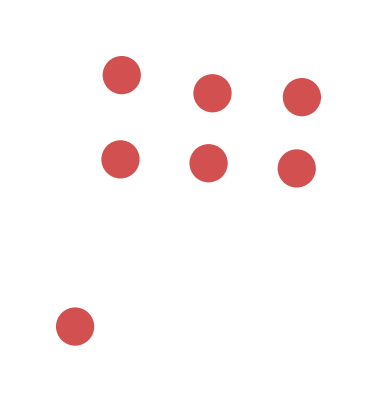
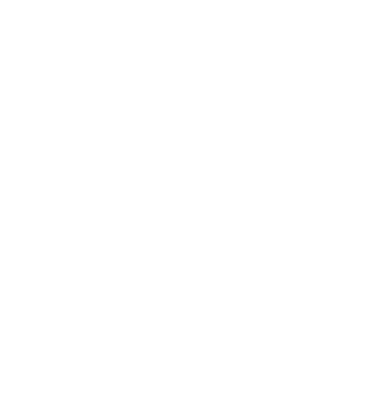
part: (121, 75) -> none
part: (212, 93) -> none
part: (301, 97) -> none
part: (120, 159) -> none
part: (208, 163) -> none
part: (296, 168) -> none
part: (75, 326) -> none

